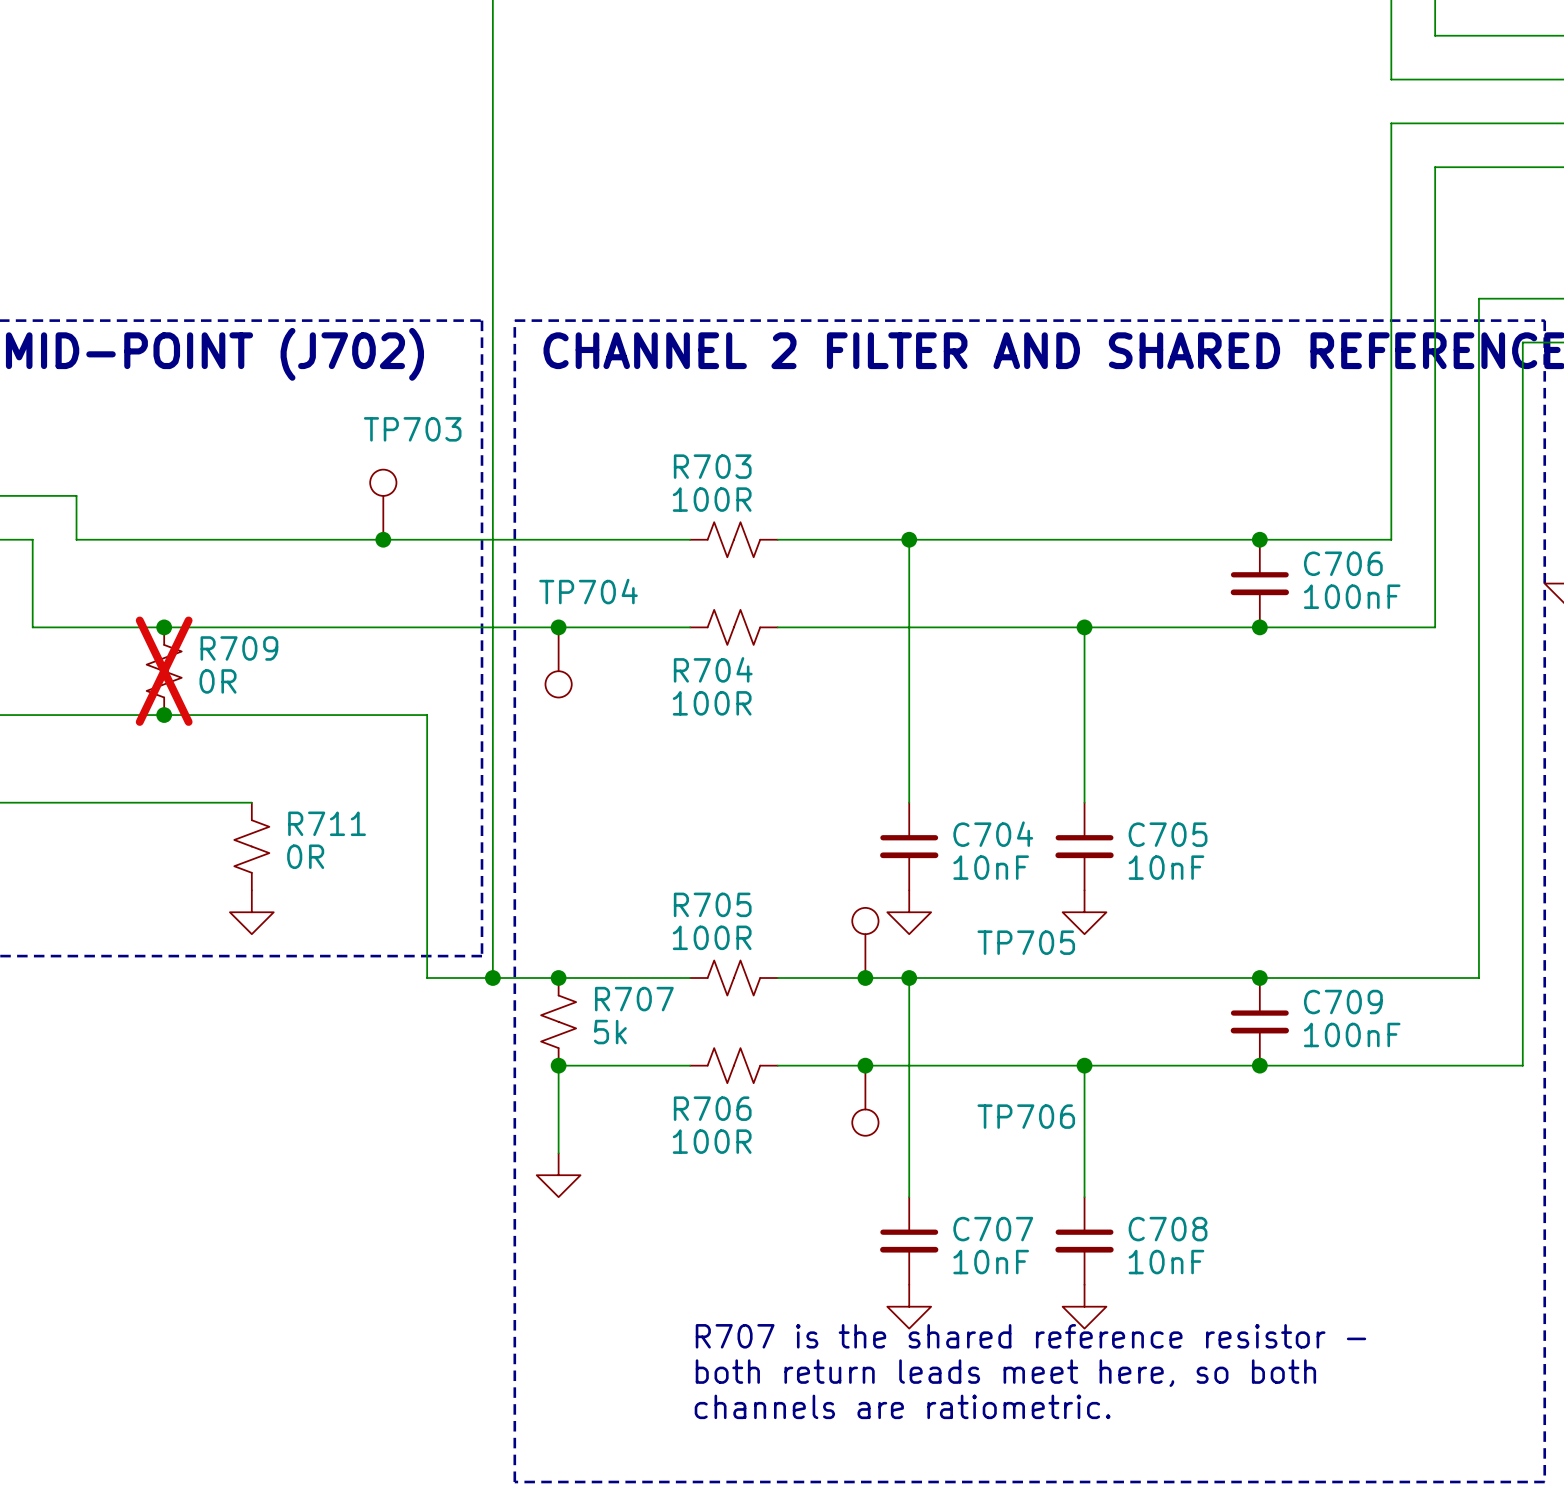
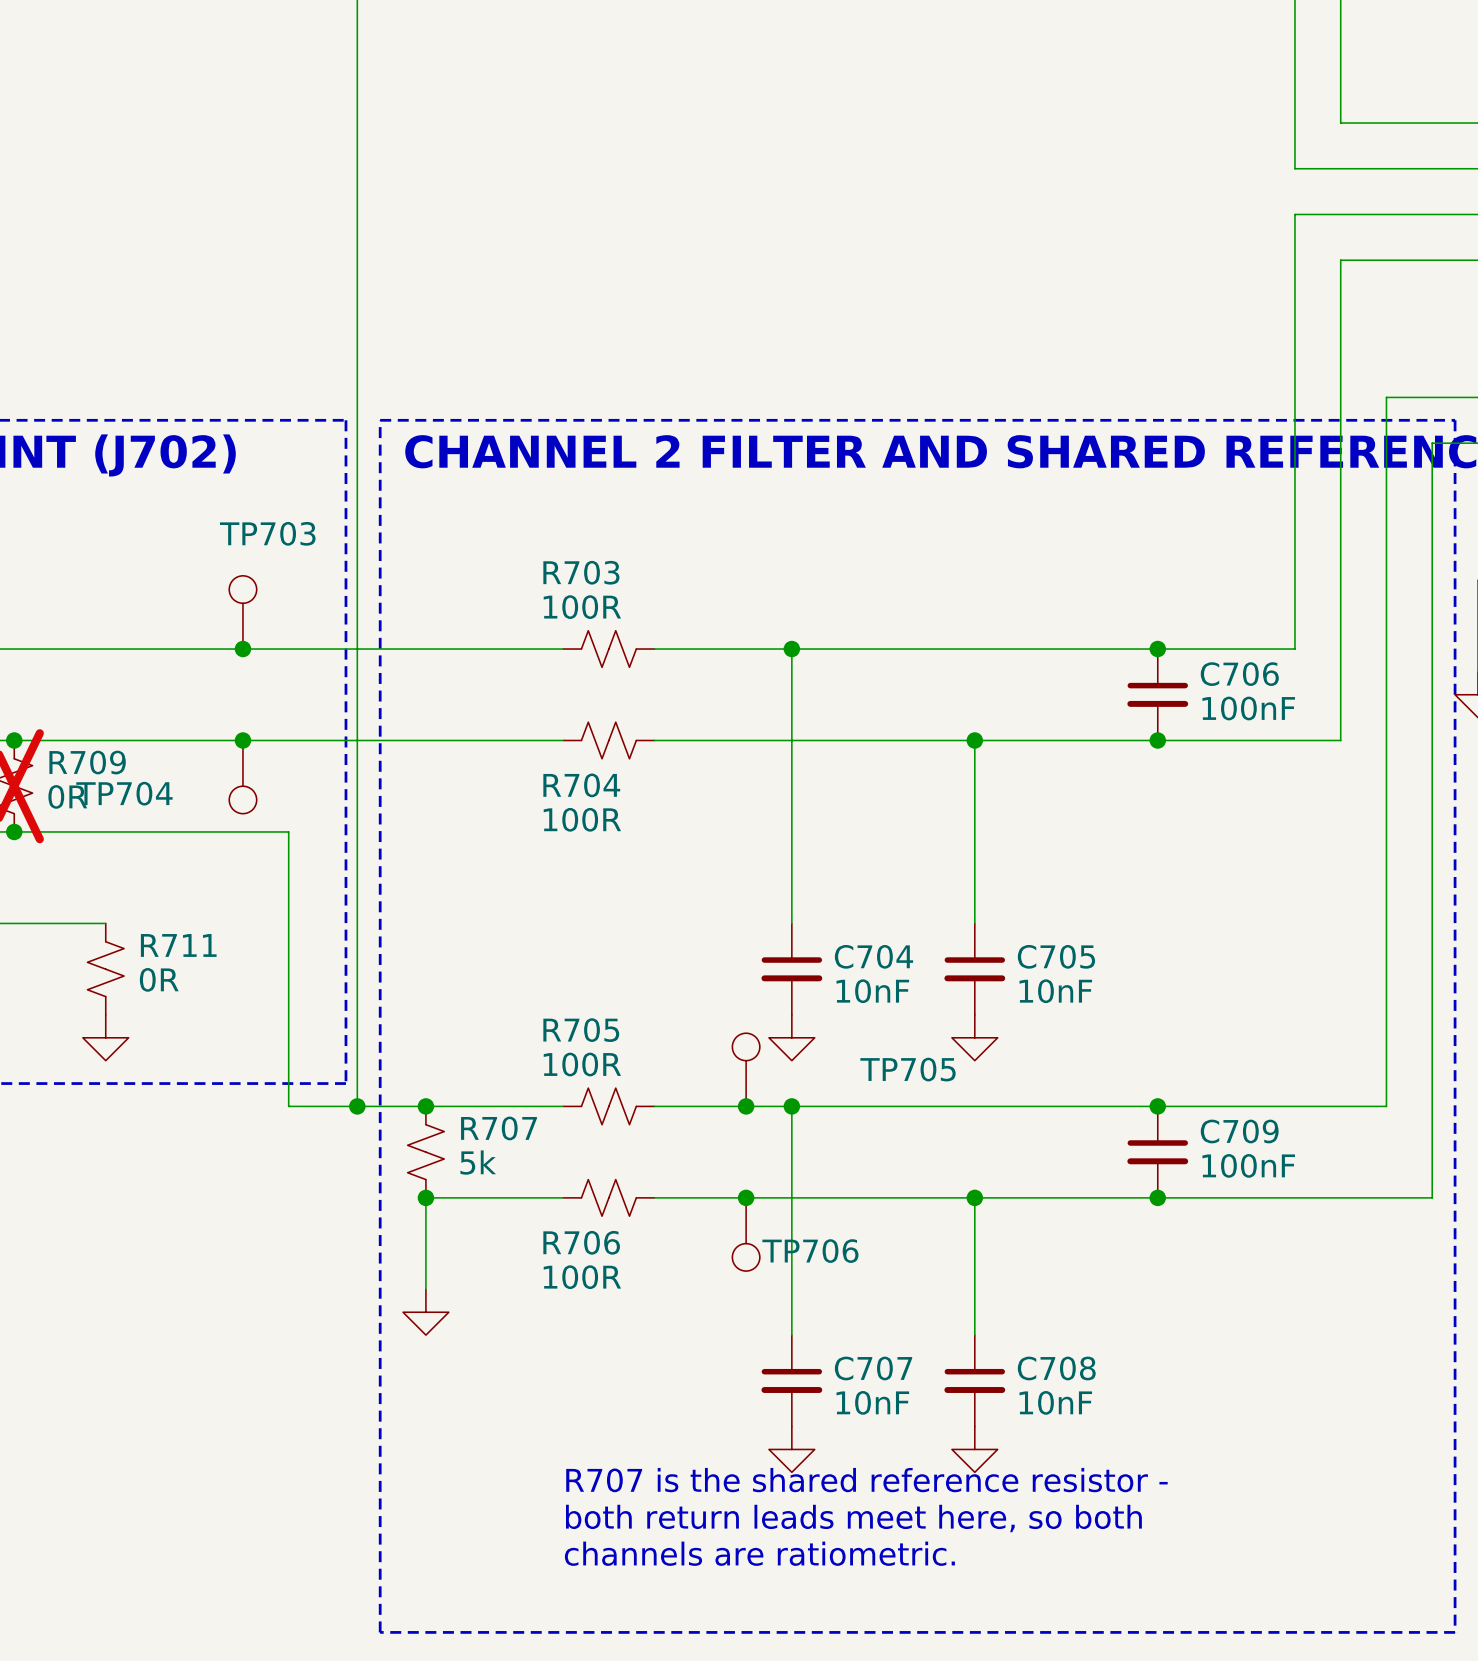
TP704 name position: TP704 (588, 591) -> TP704 (124, 793)
junction: none -> (242, 740)
junction: (558, 627) -> none
TP704 position: (558, 662) -> (242, 777)
TP706 name position: TP706 (1026, 1116) -> TP706 (810, 1251)

